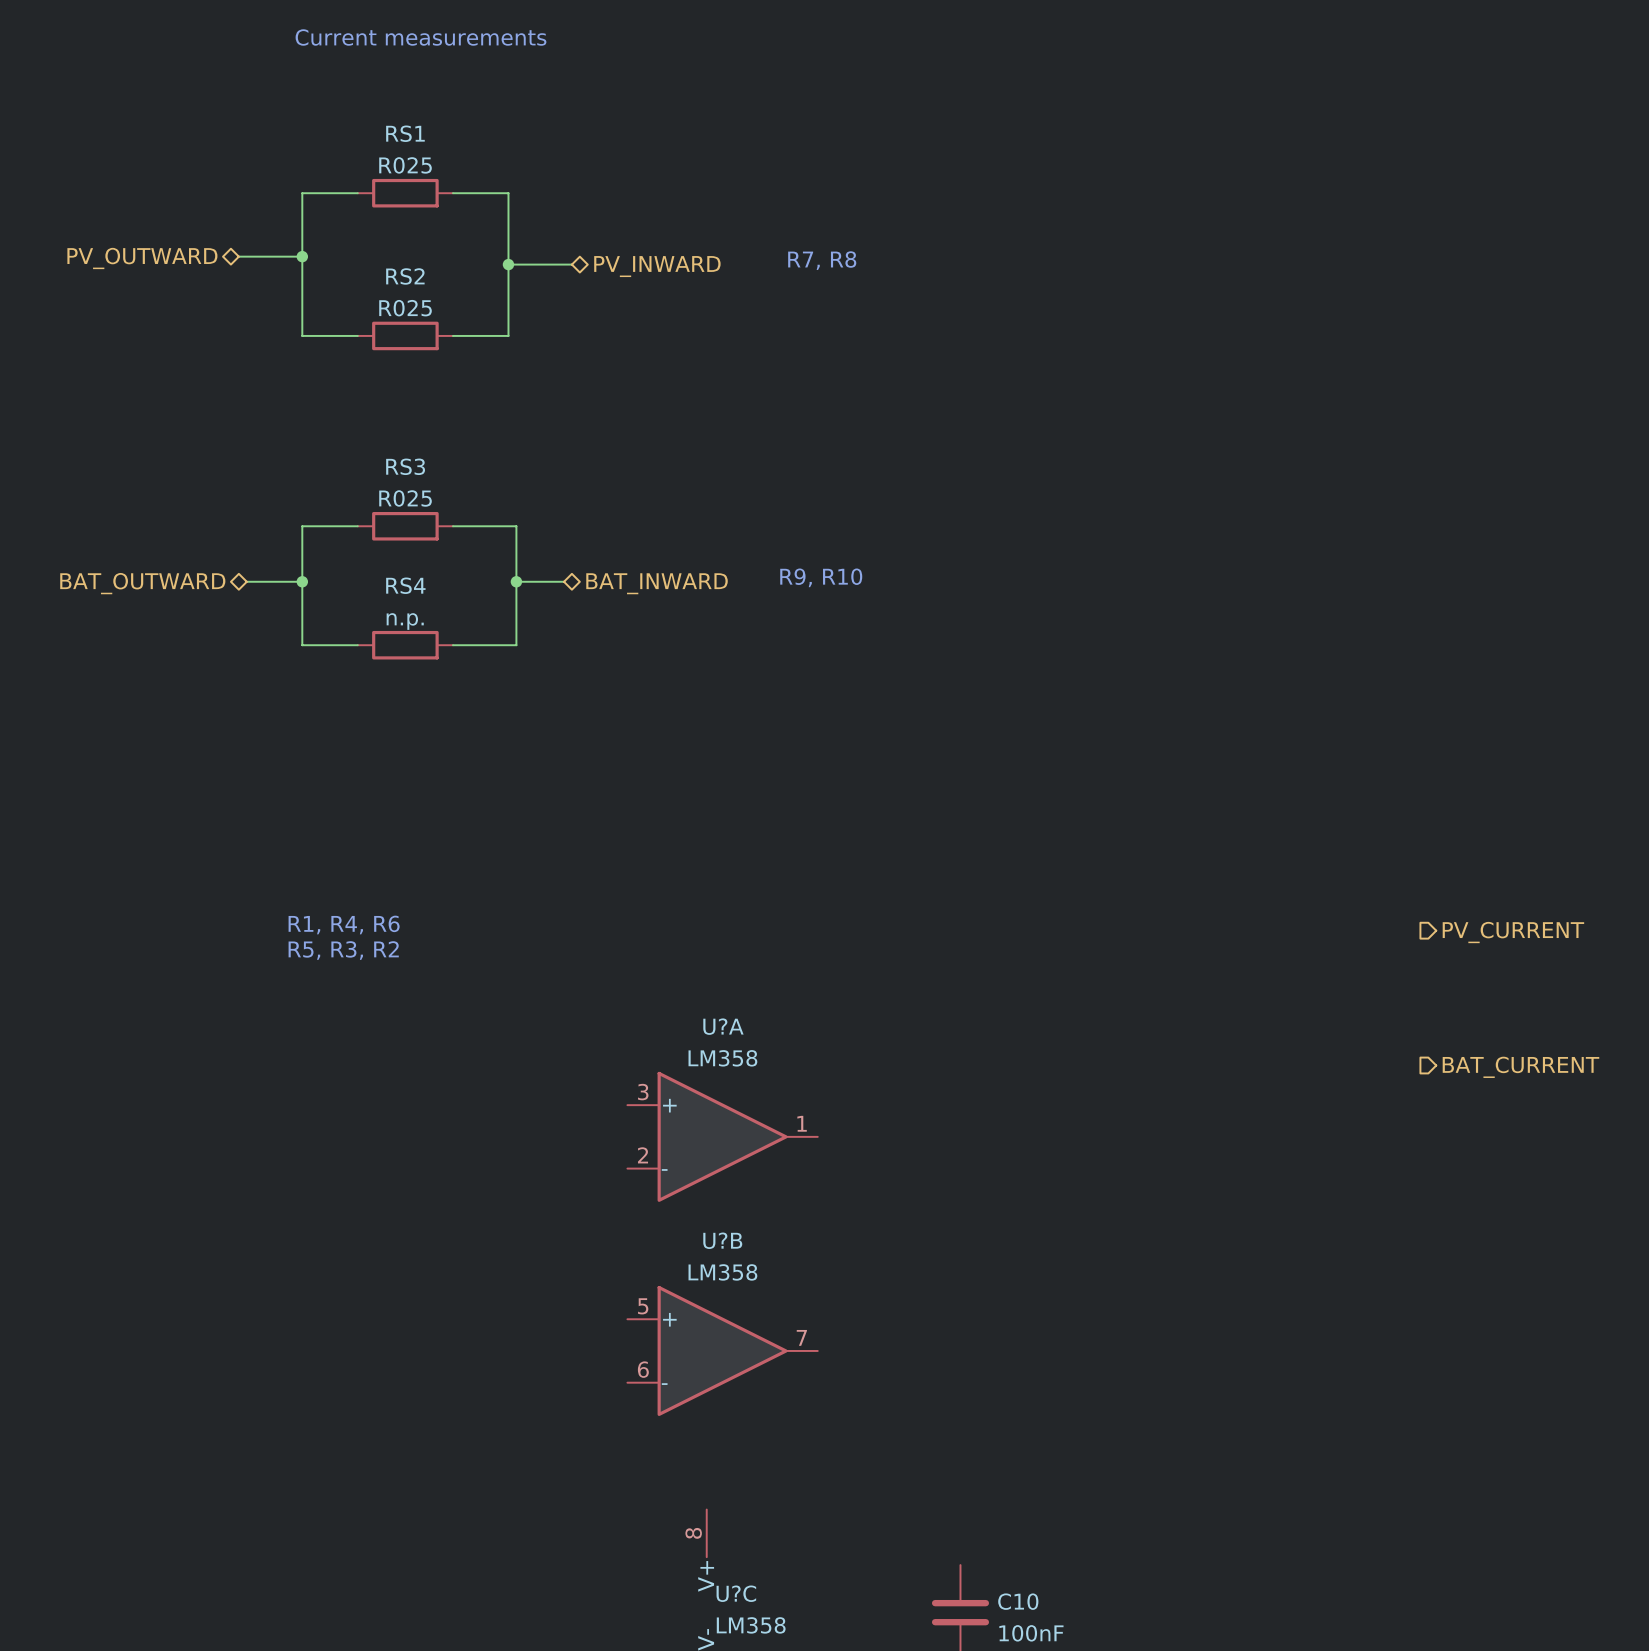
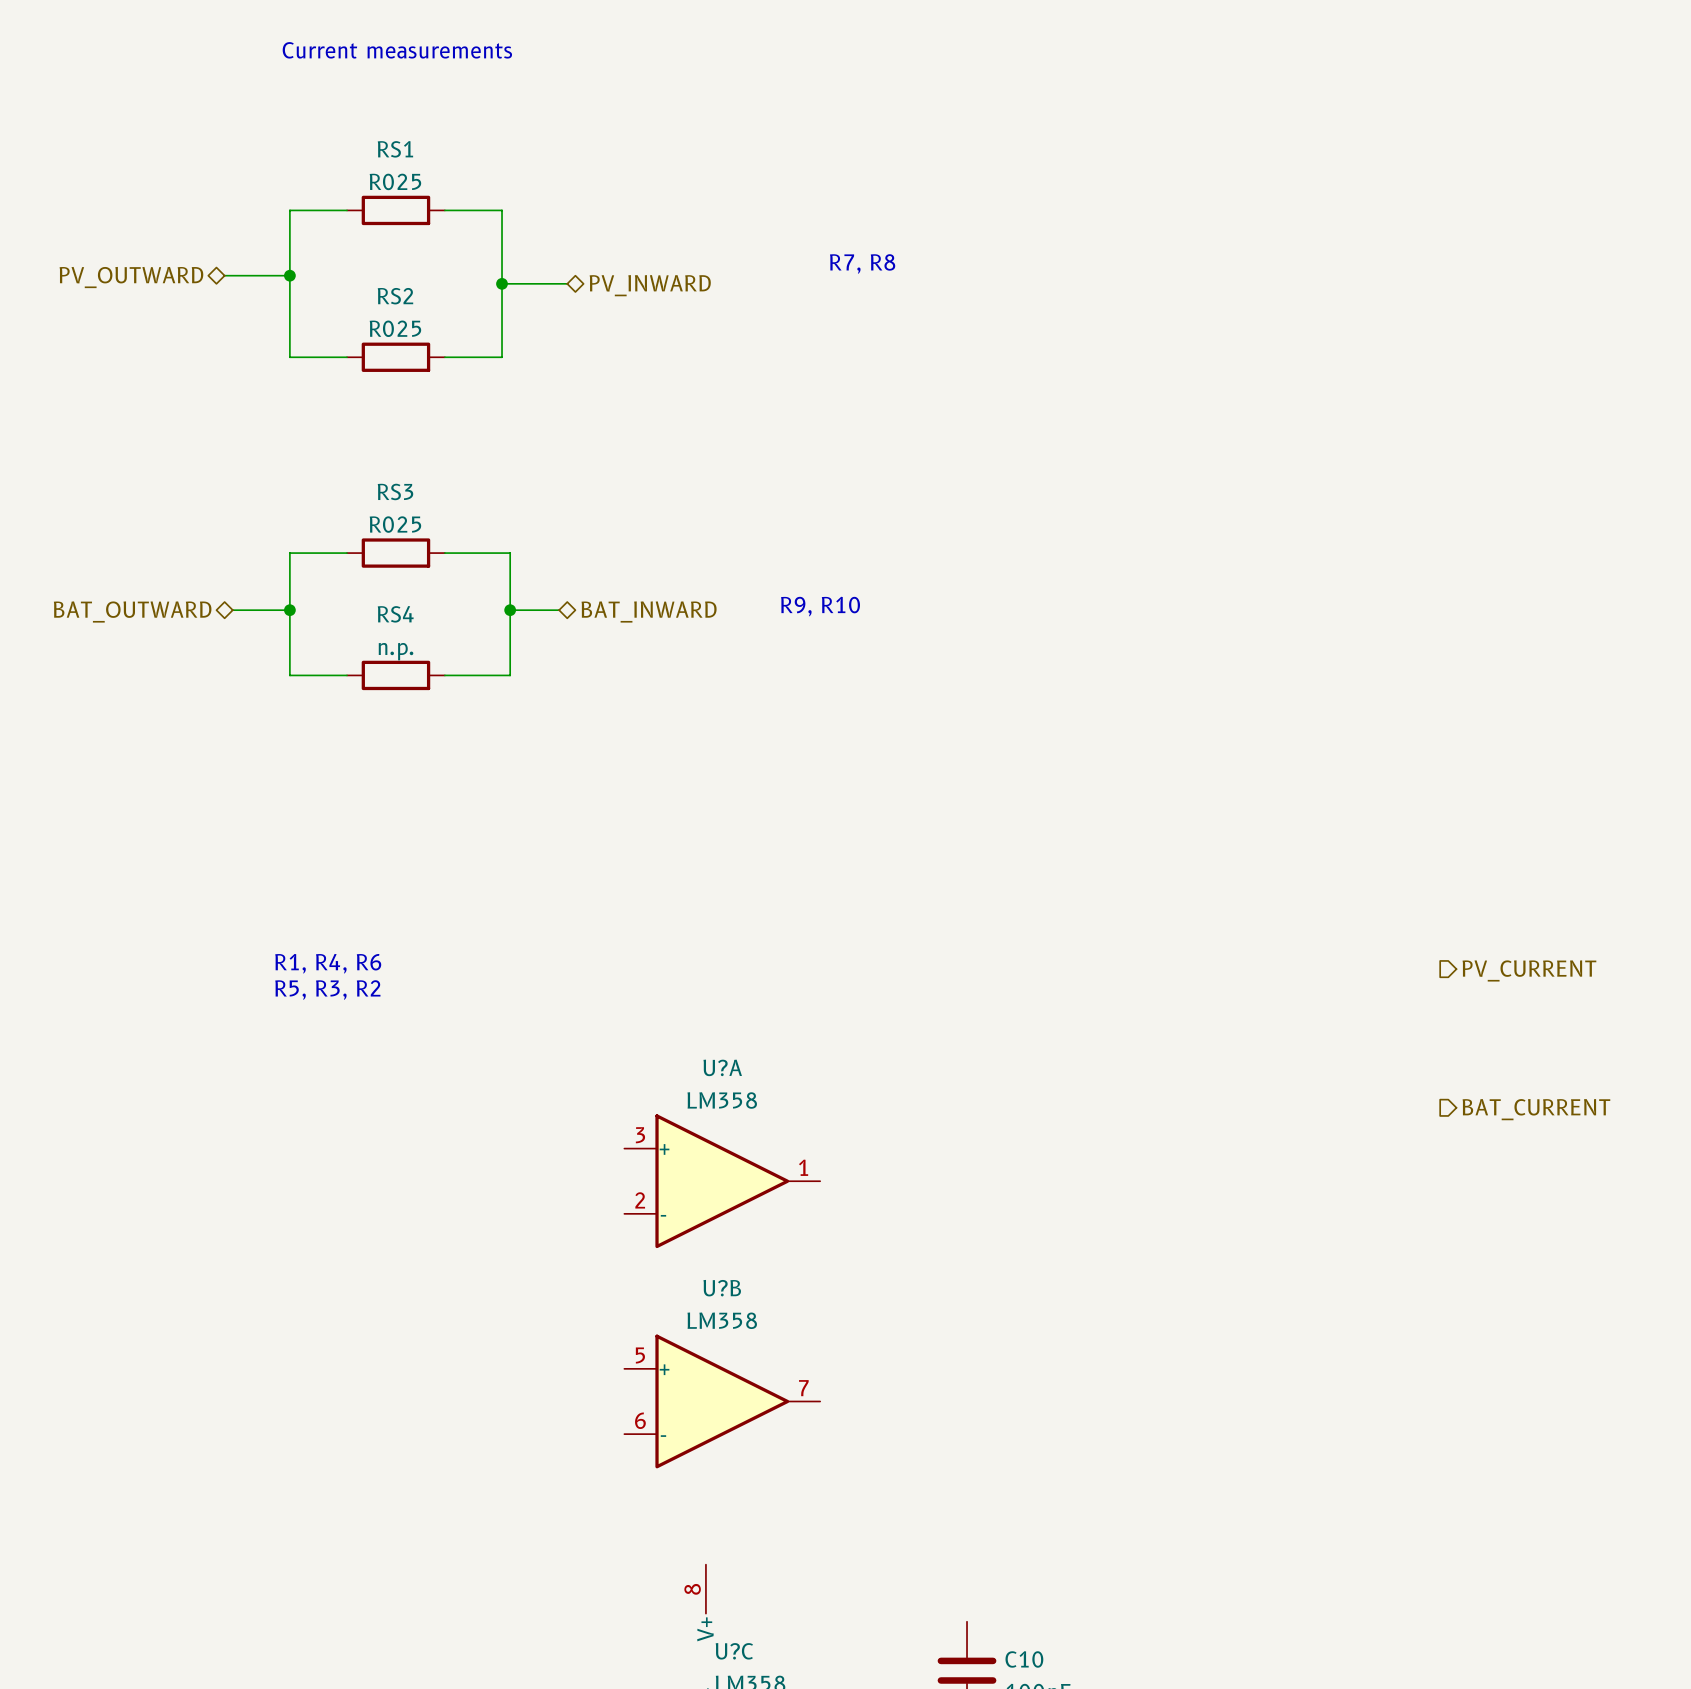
text position: R7, R8 (822, 260) -> R7, R8 (862, 263)

